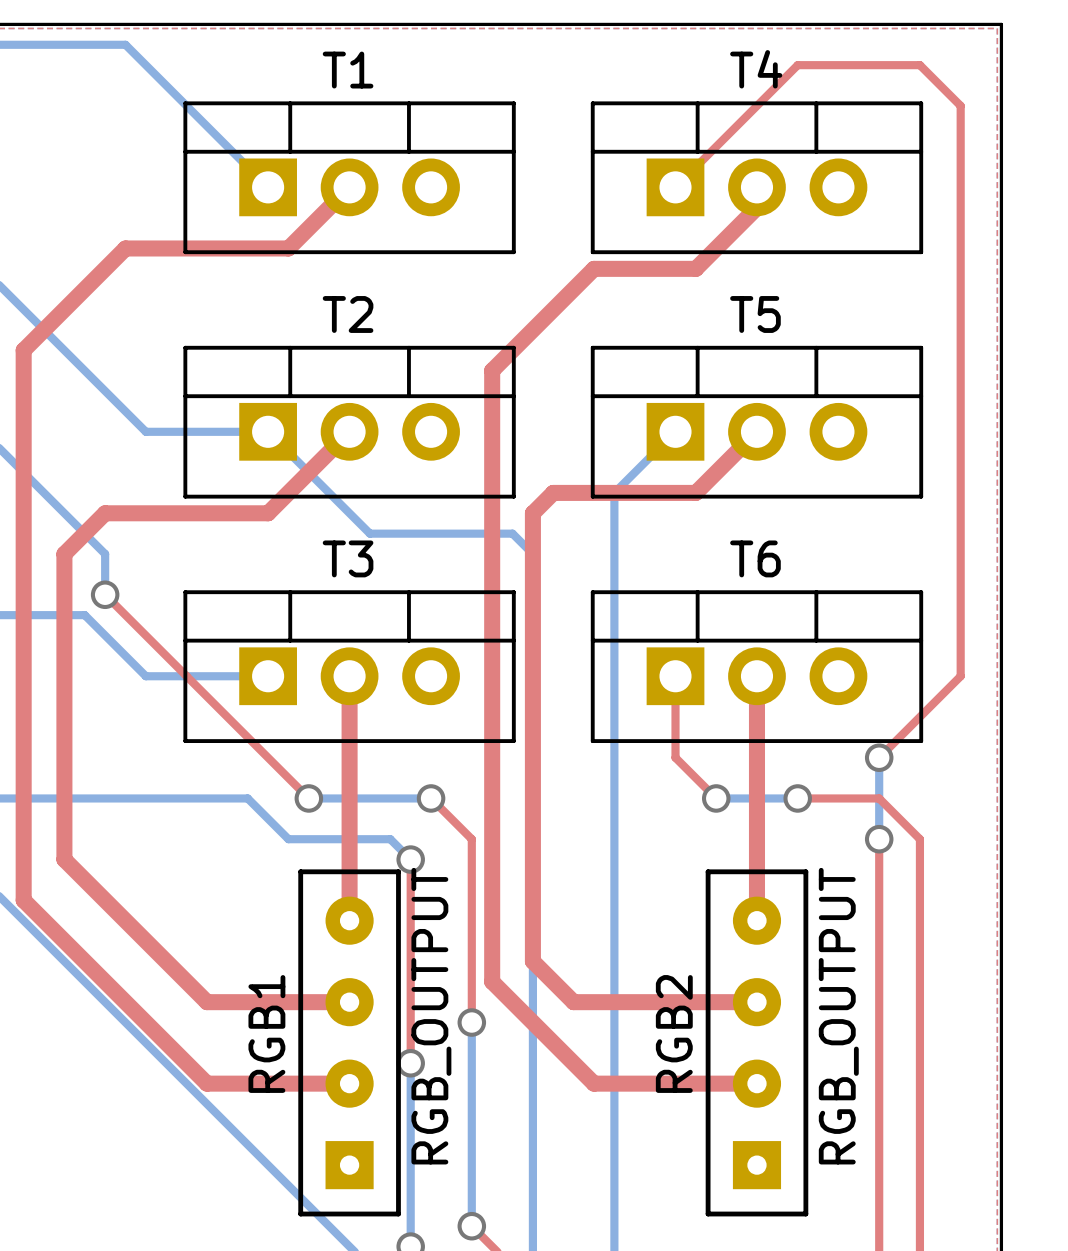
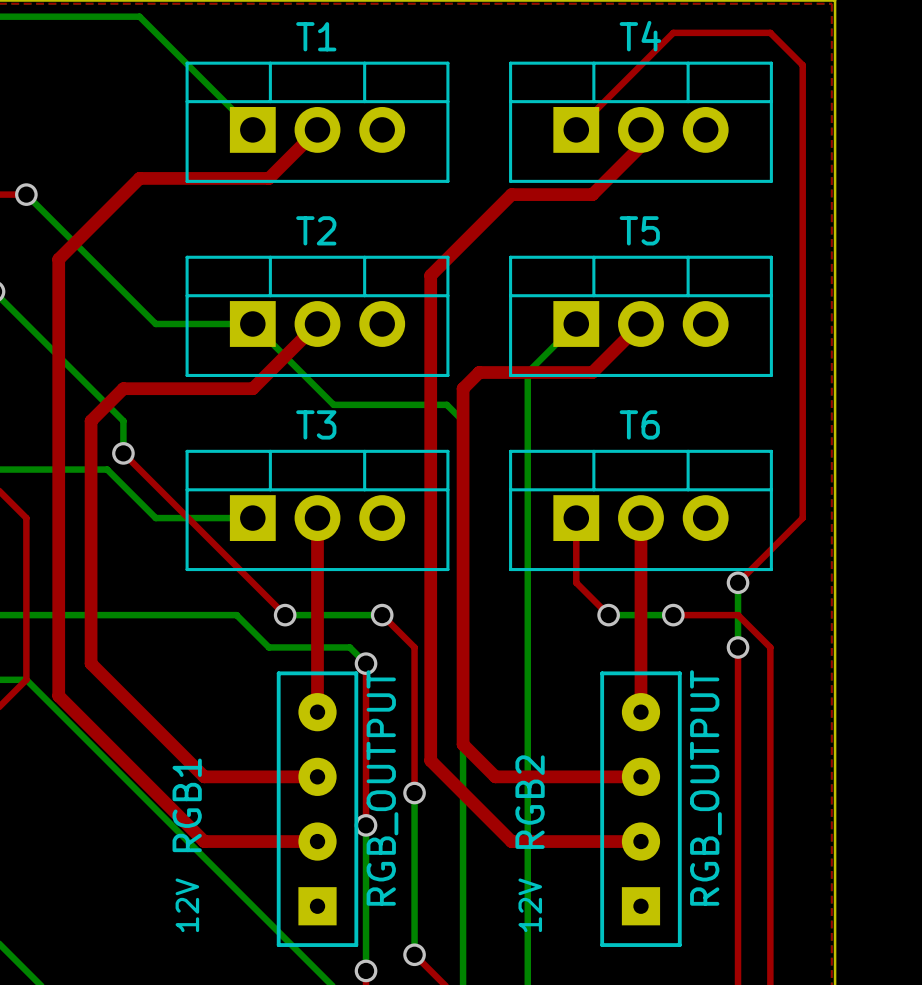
RGB1 name position: RGB1 (266, 1033) -> RGB1 (187, 805)
RGB2 name position: RGB2 (674, 1033) -> RGB2 (530, 802)
text: none -> 12V (187, 905)
text: none -> 12V (530, 905)

